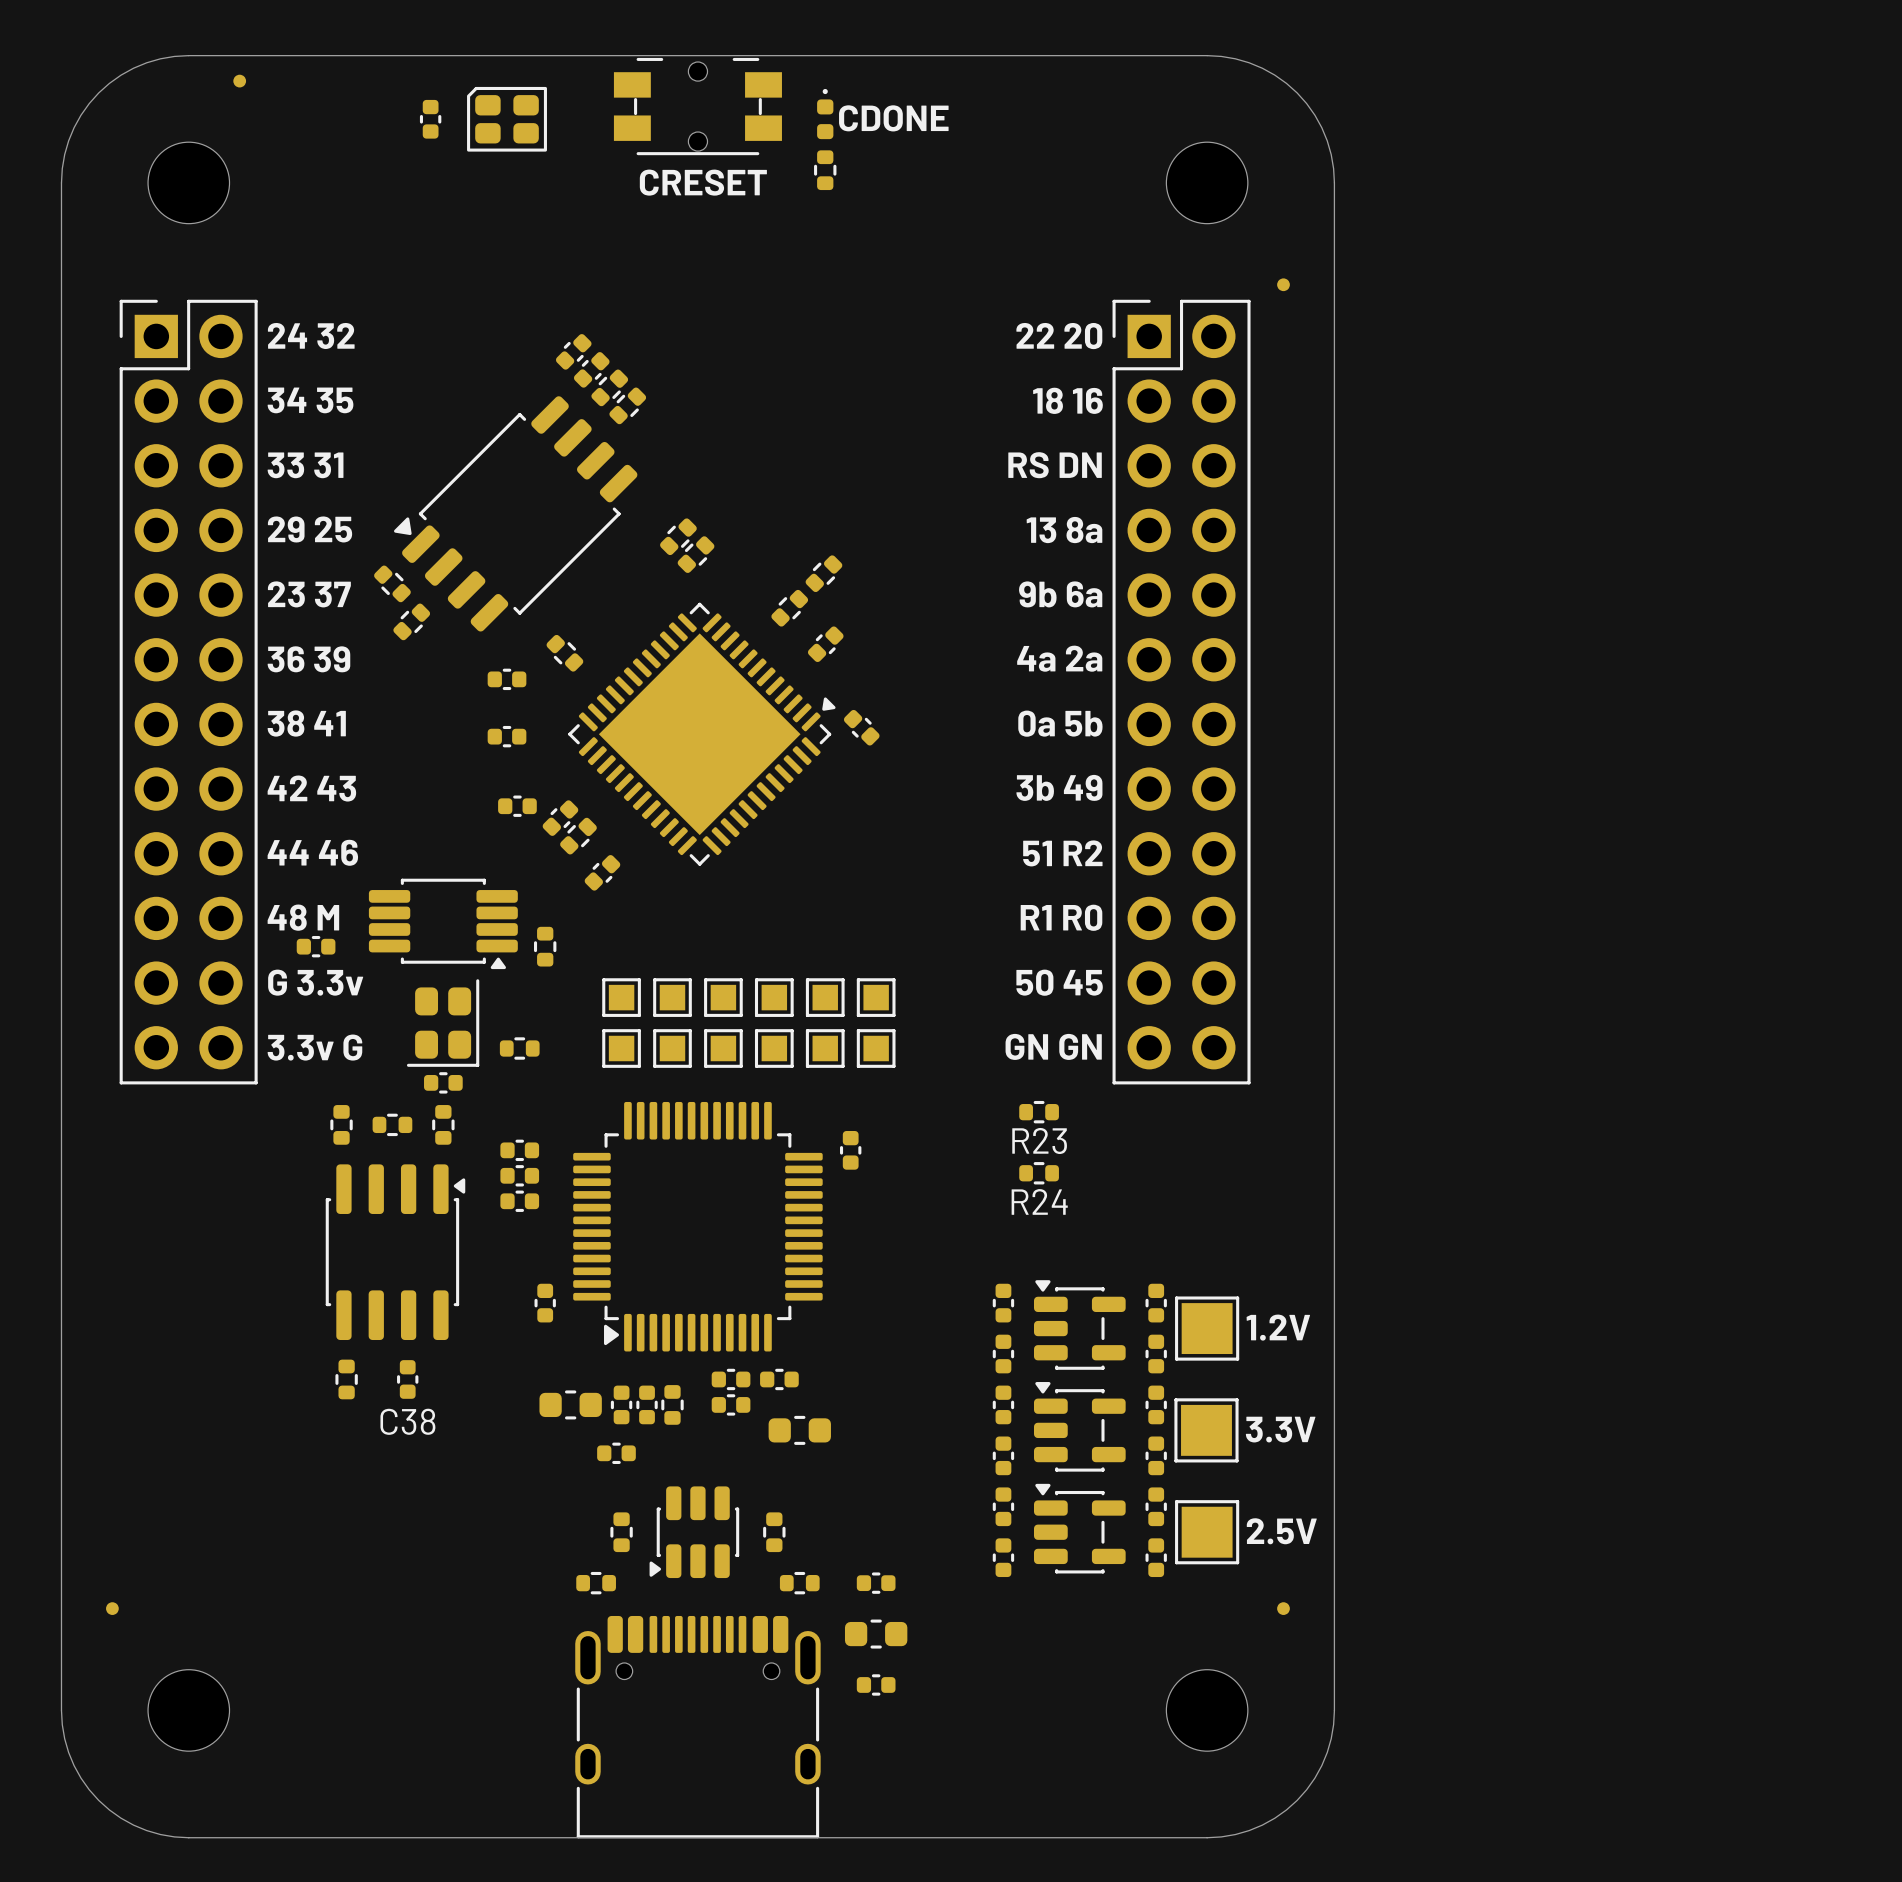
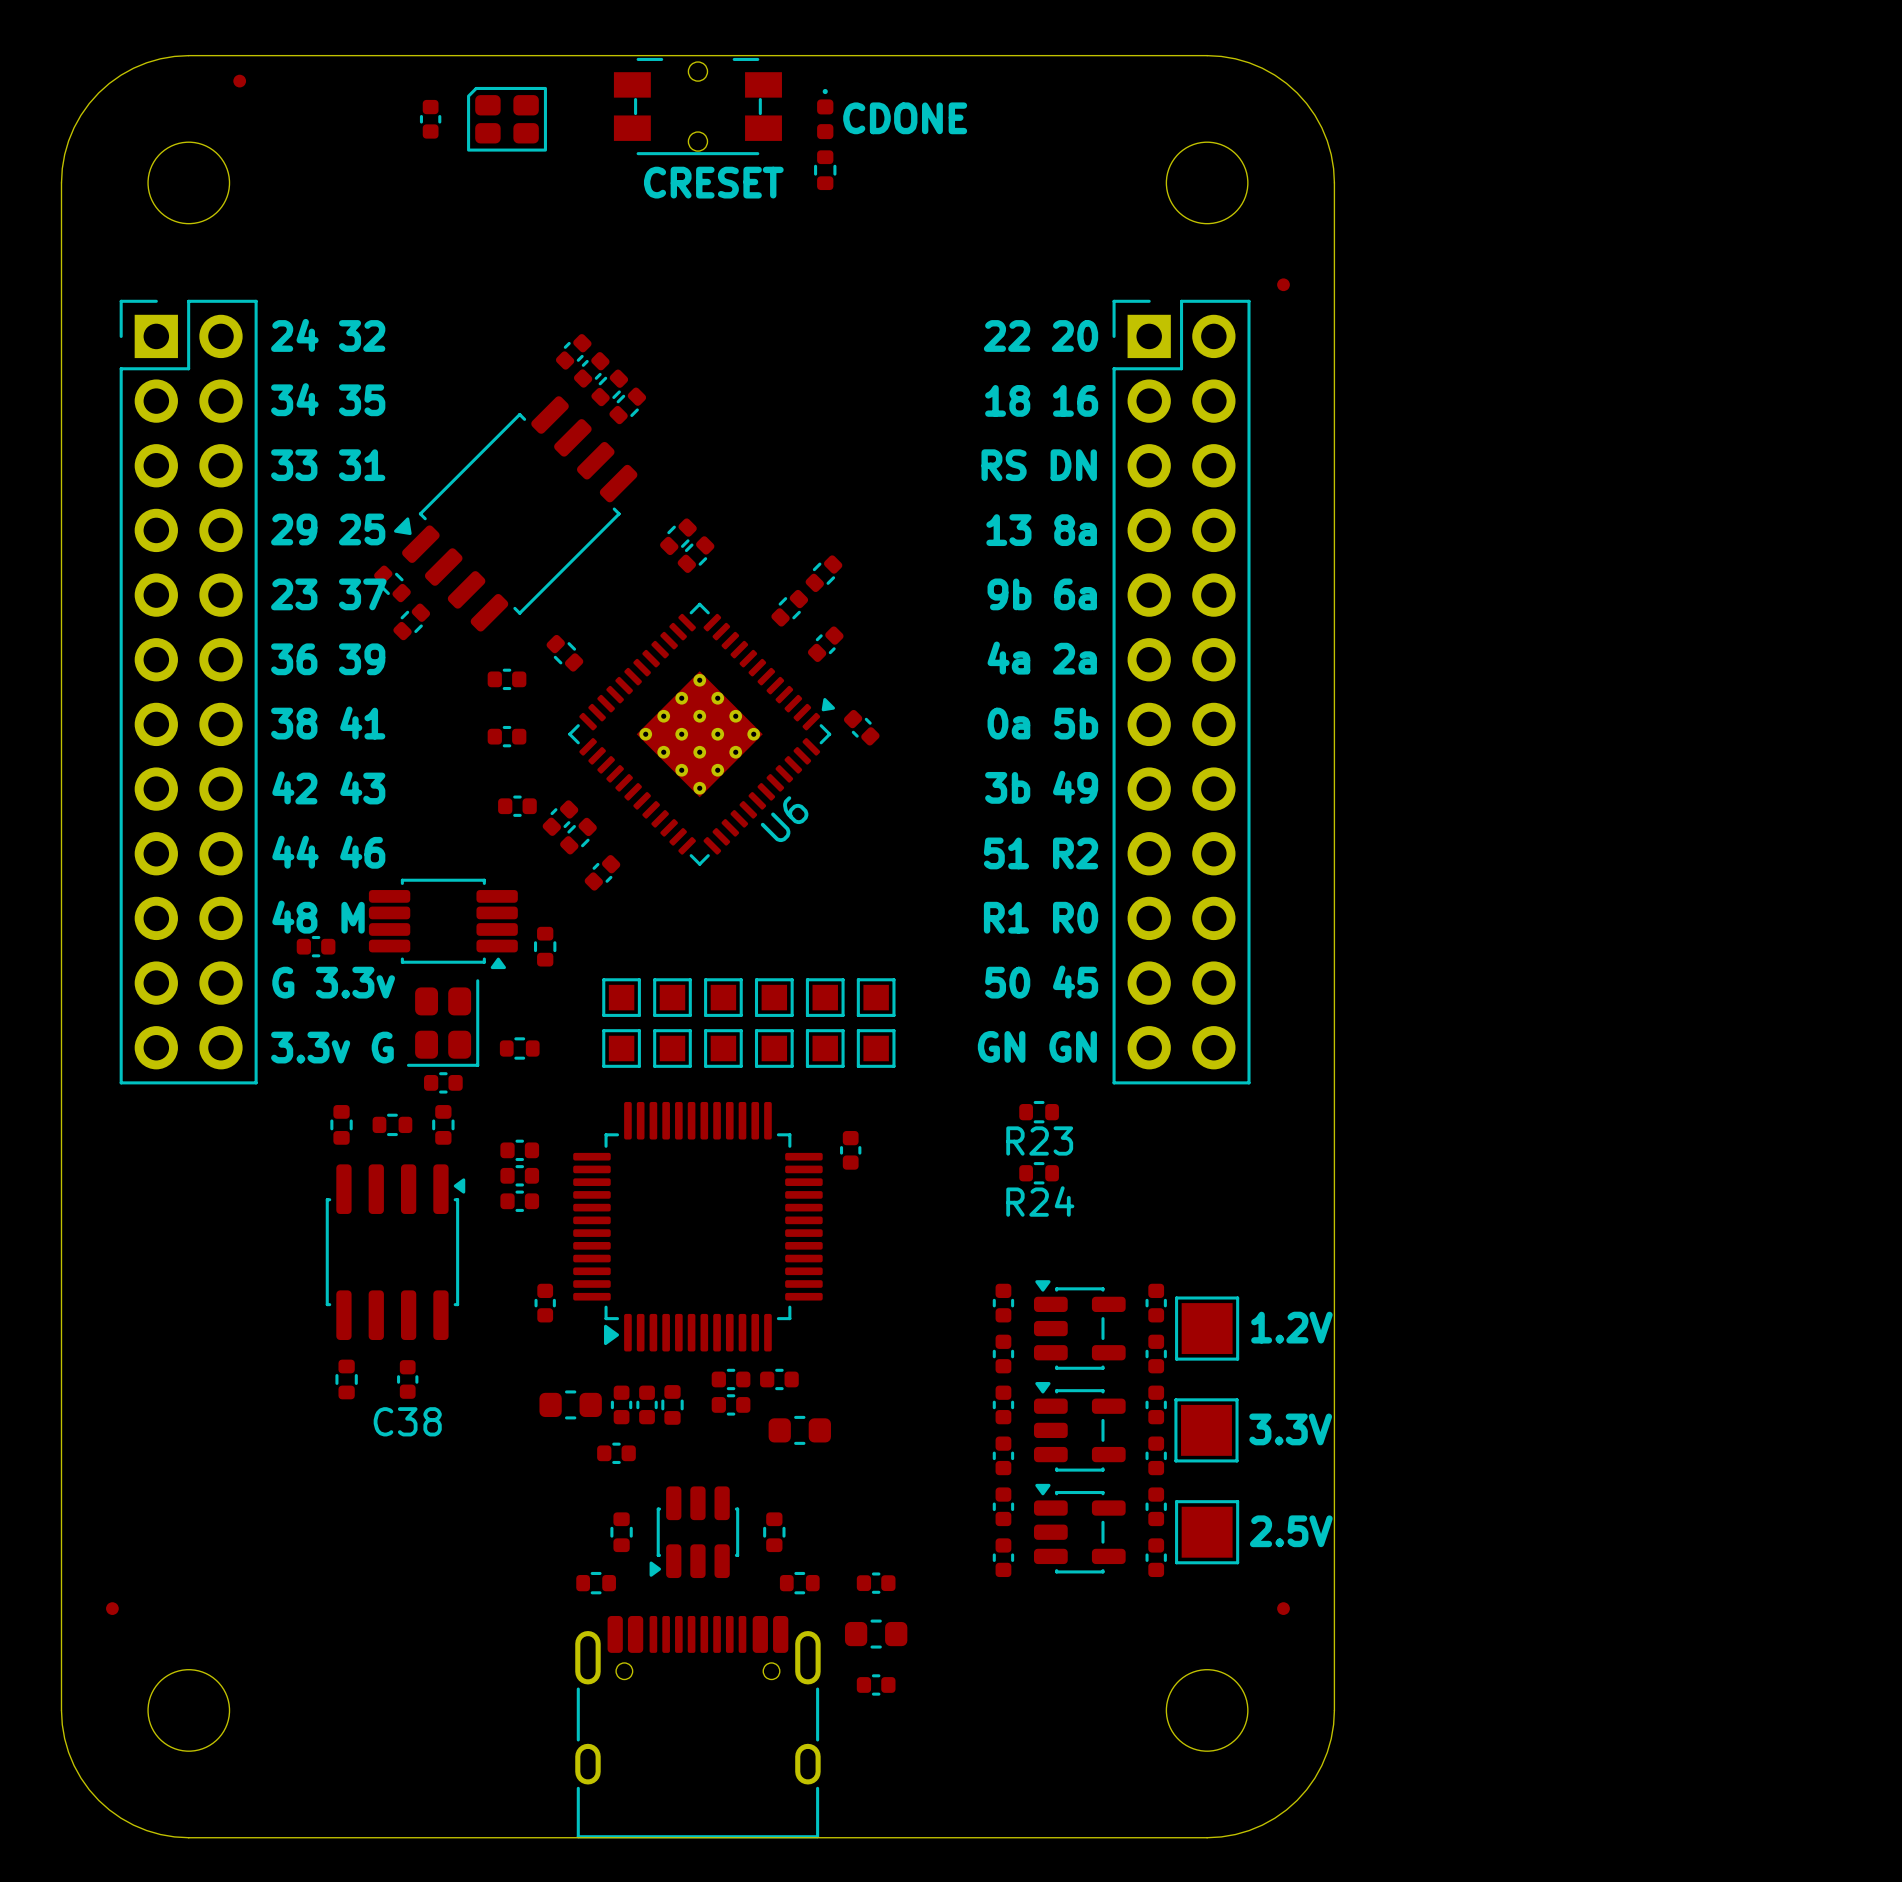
part: (701, 734) -> none
U6: none -> (701, 734)

